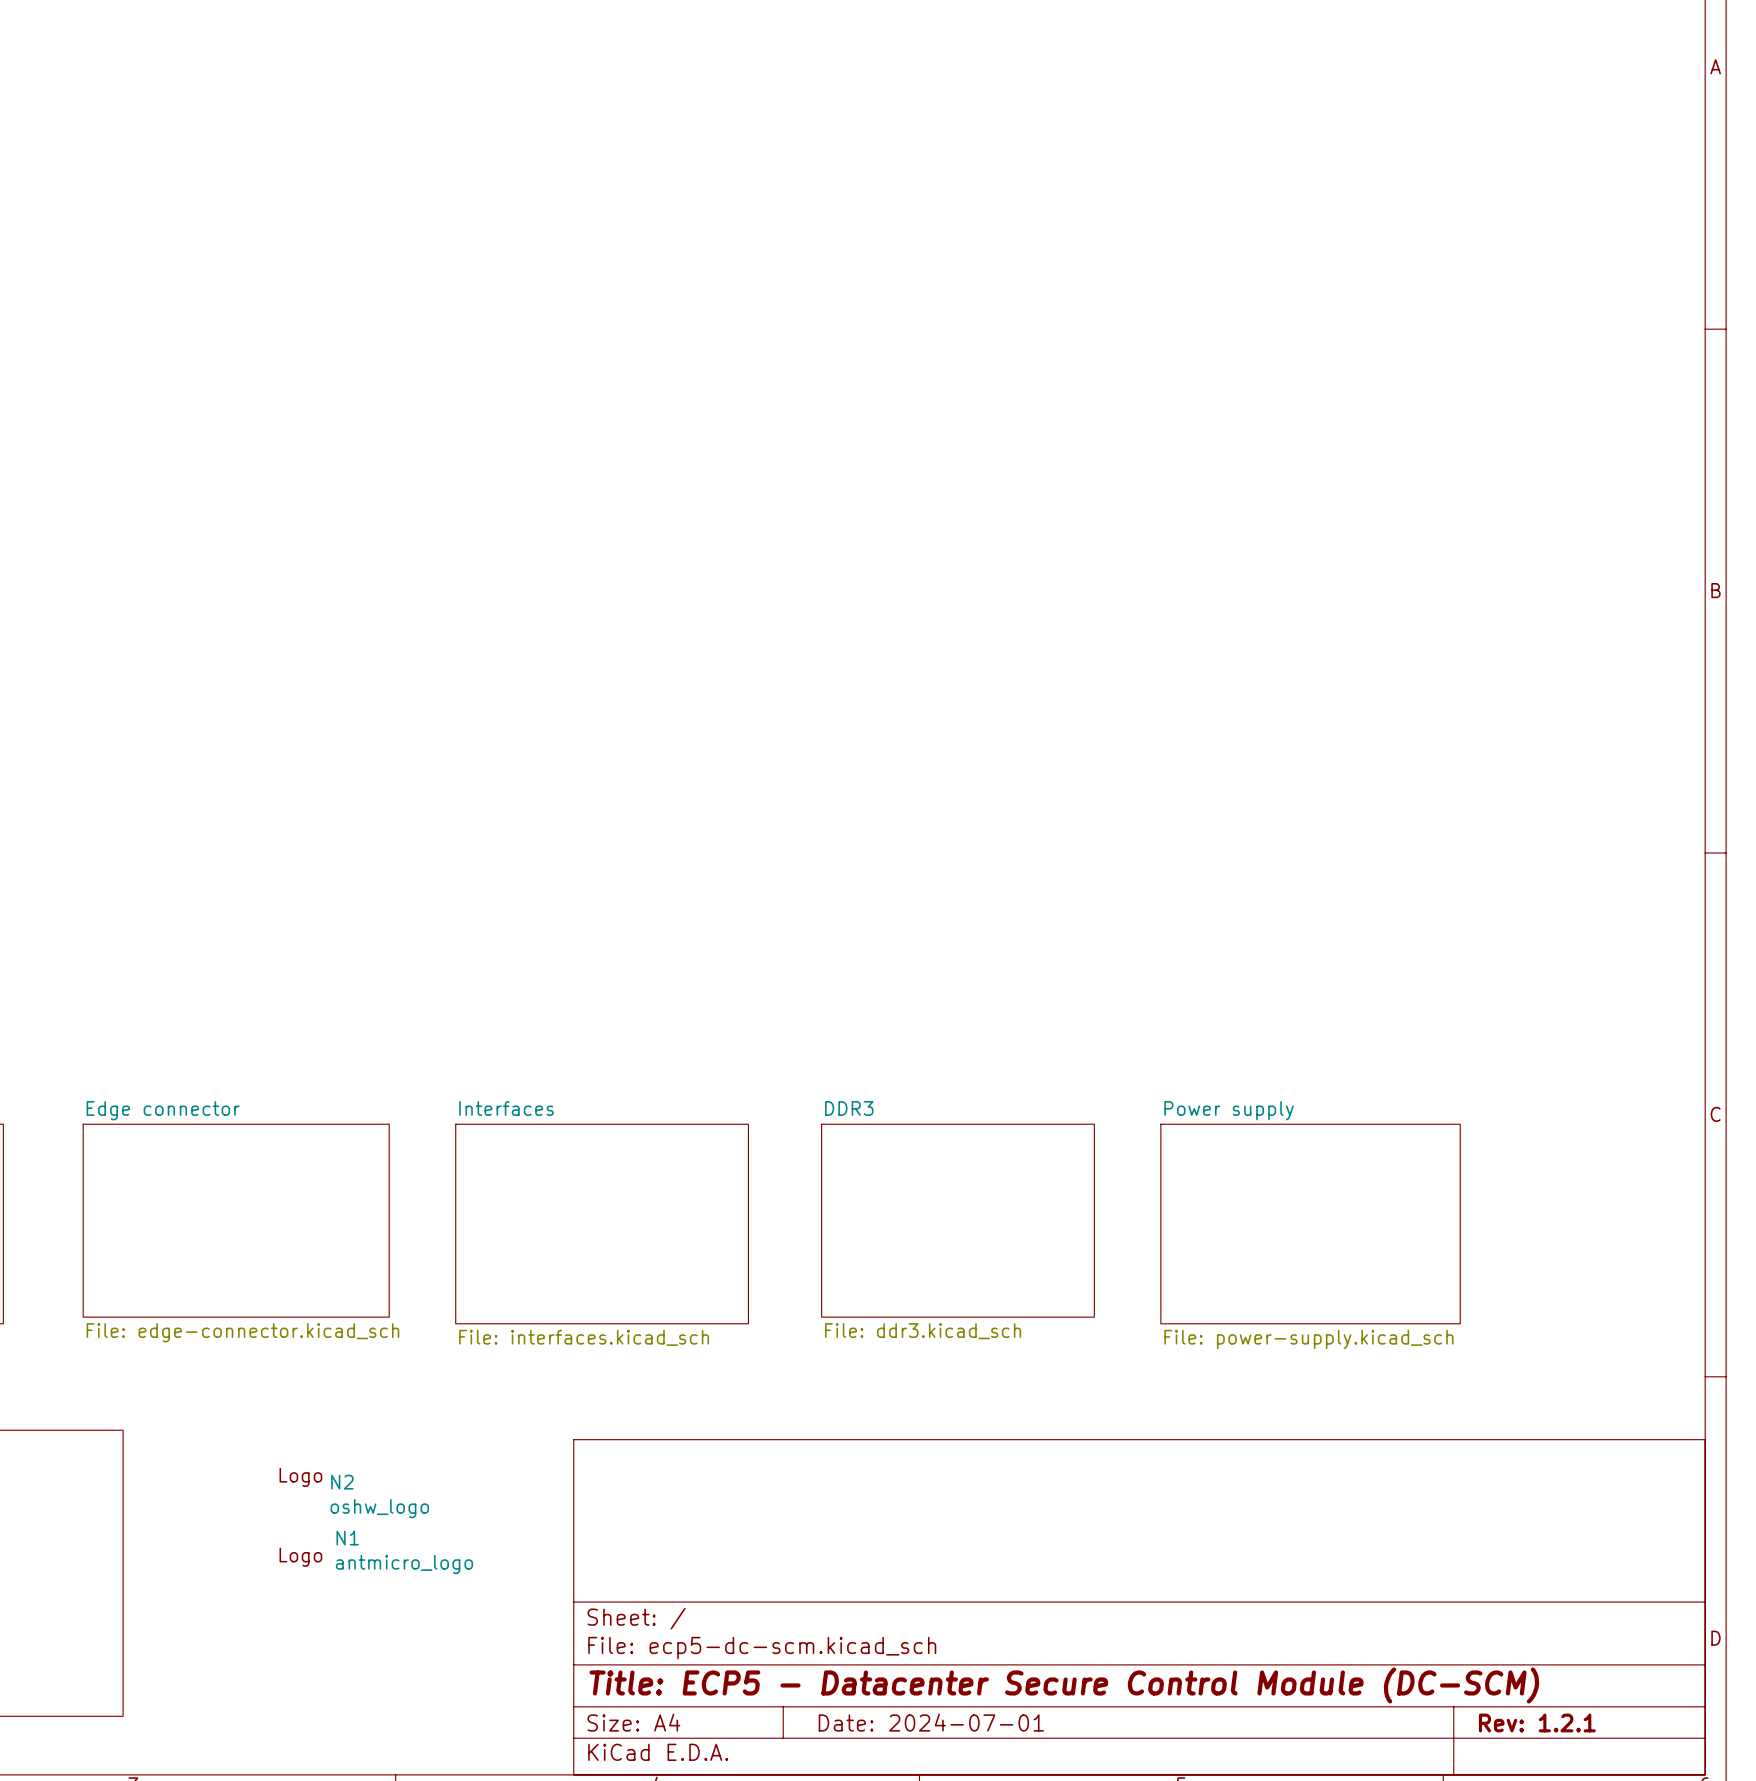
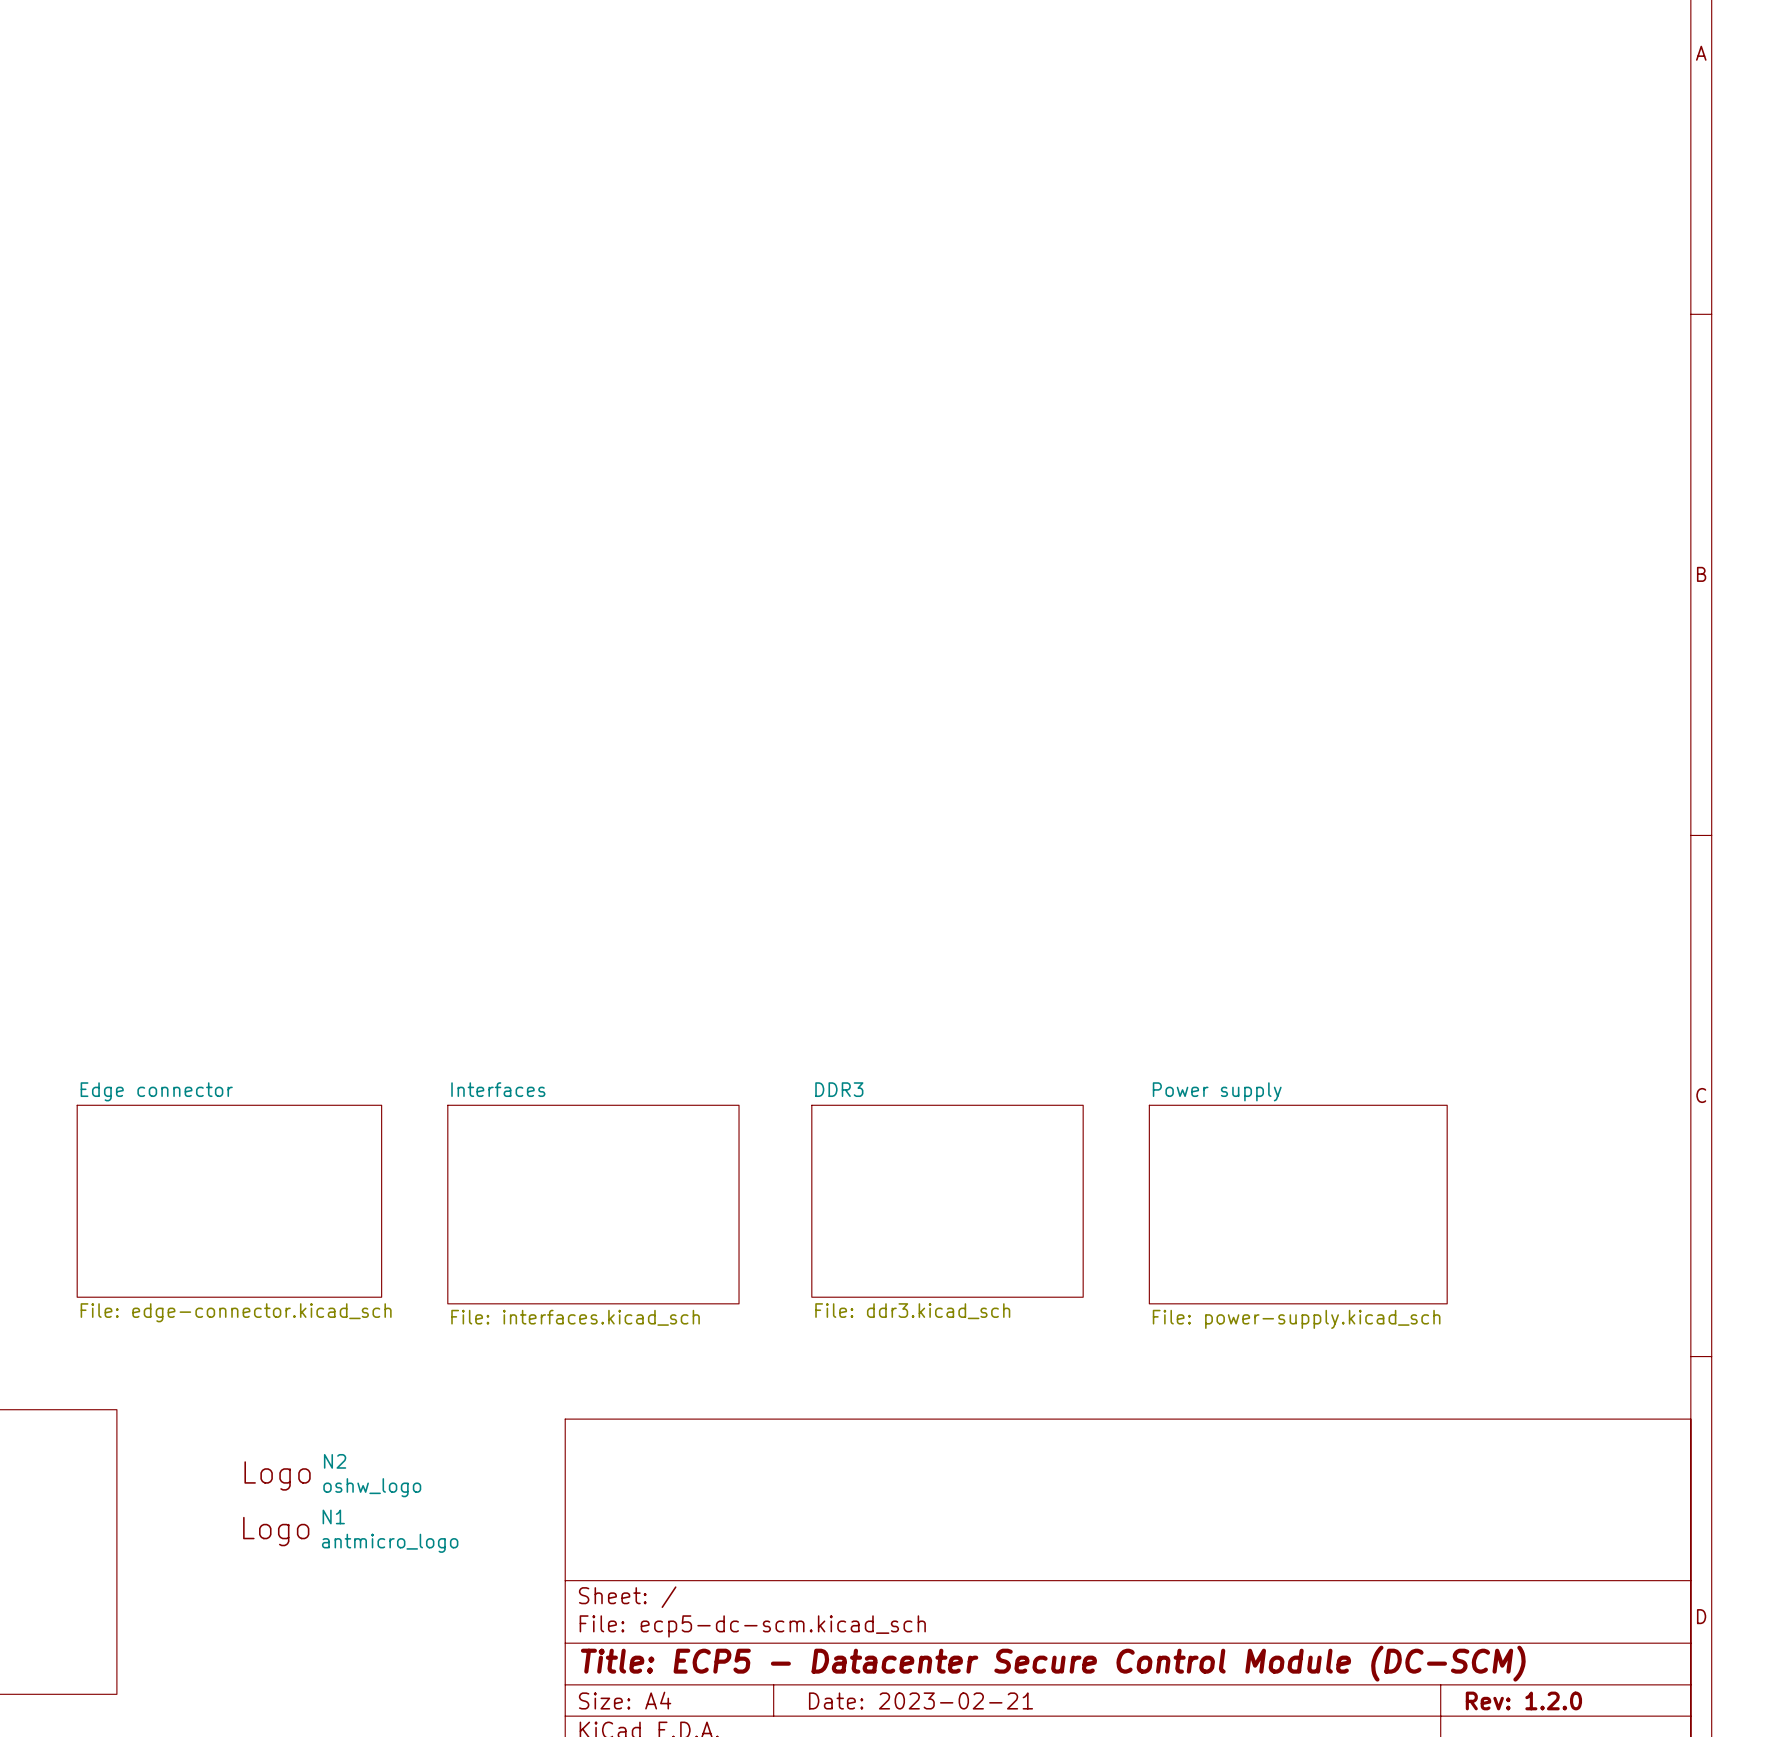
N2 symbol: [279, 1467, 430, 1519] -> [244, 1453, 422, 1498]
N1 symbol: [279, 1530, 474, 1575] -> [243, 1509, 459, 1553]
title block: Date: 2024-07-01 (931, 1722) -> Date: 2023-02-21 (921, 1700)
title block: Rev: 1.2.1 (1537, 1722) -> Rev: 1.2.0 (1523, 1700)

